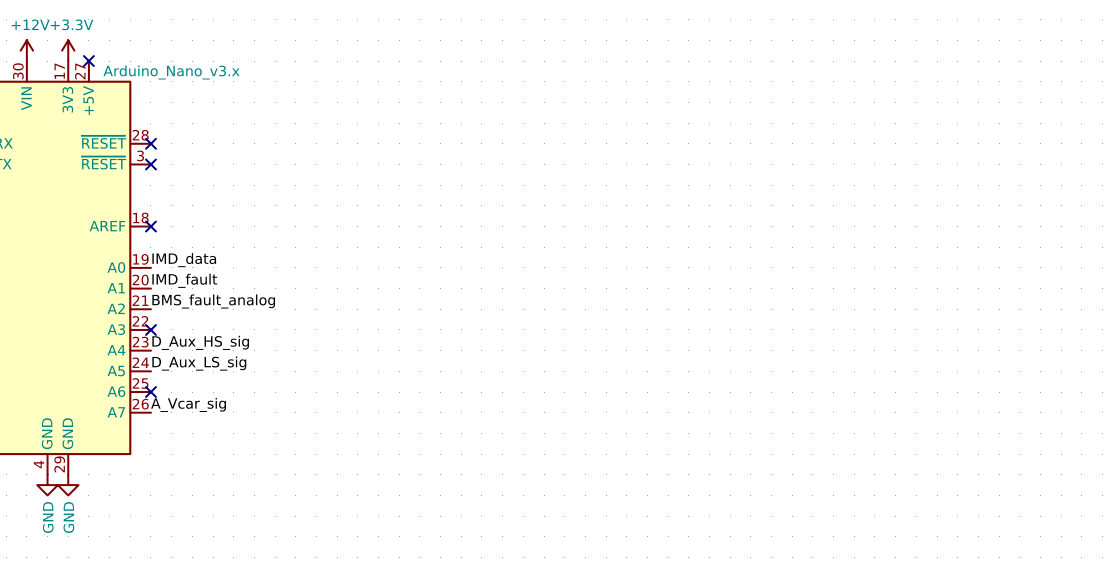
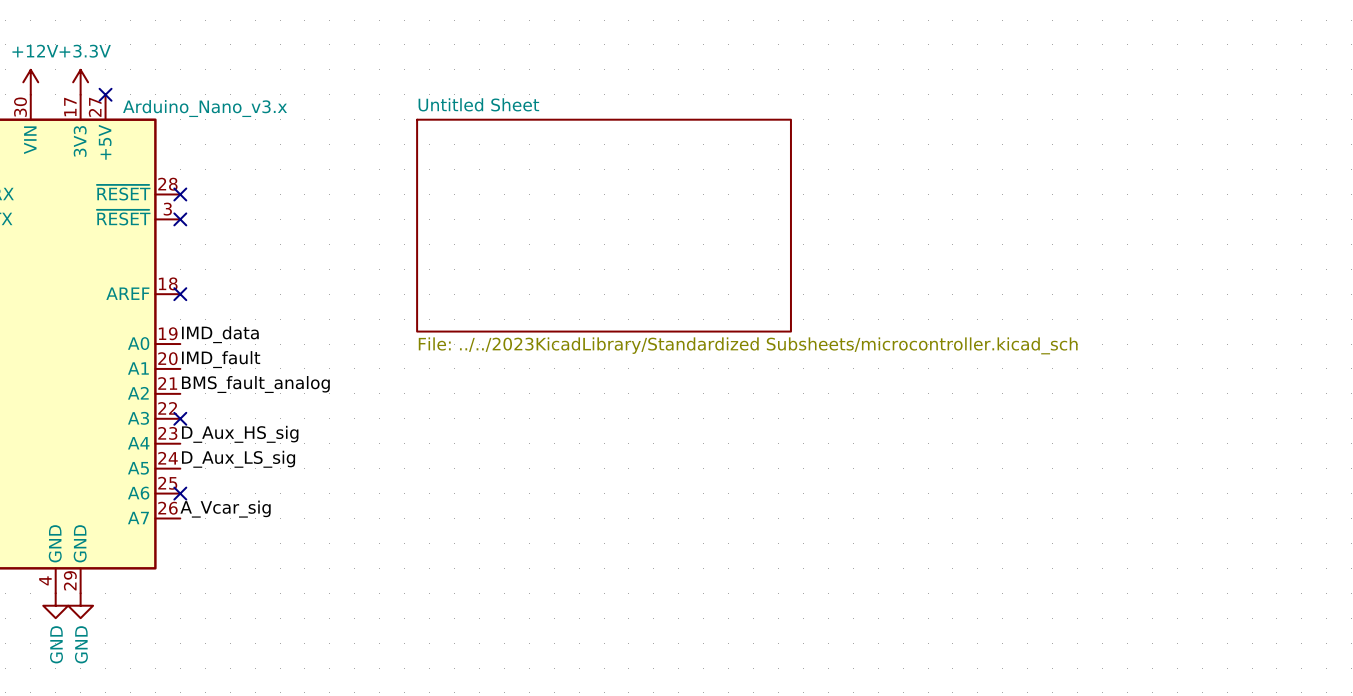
sheet Untitled Sheet: none -> File: ../../2023KicadLibrary/Standardized Subsheets/microcontroller.kicad_sch (604, 225)

